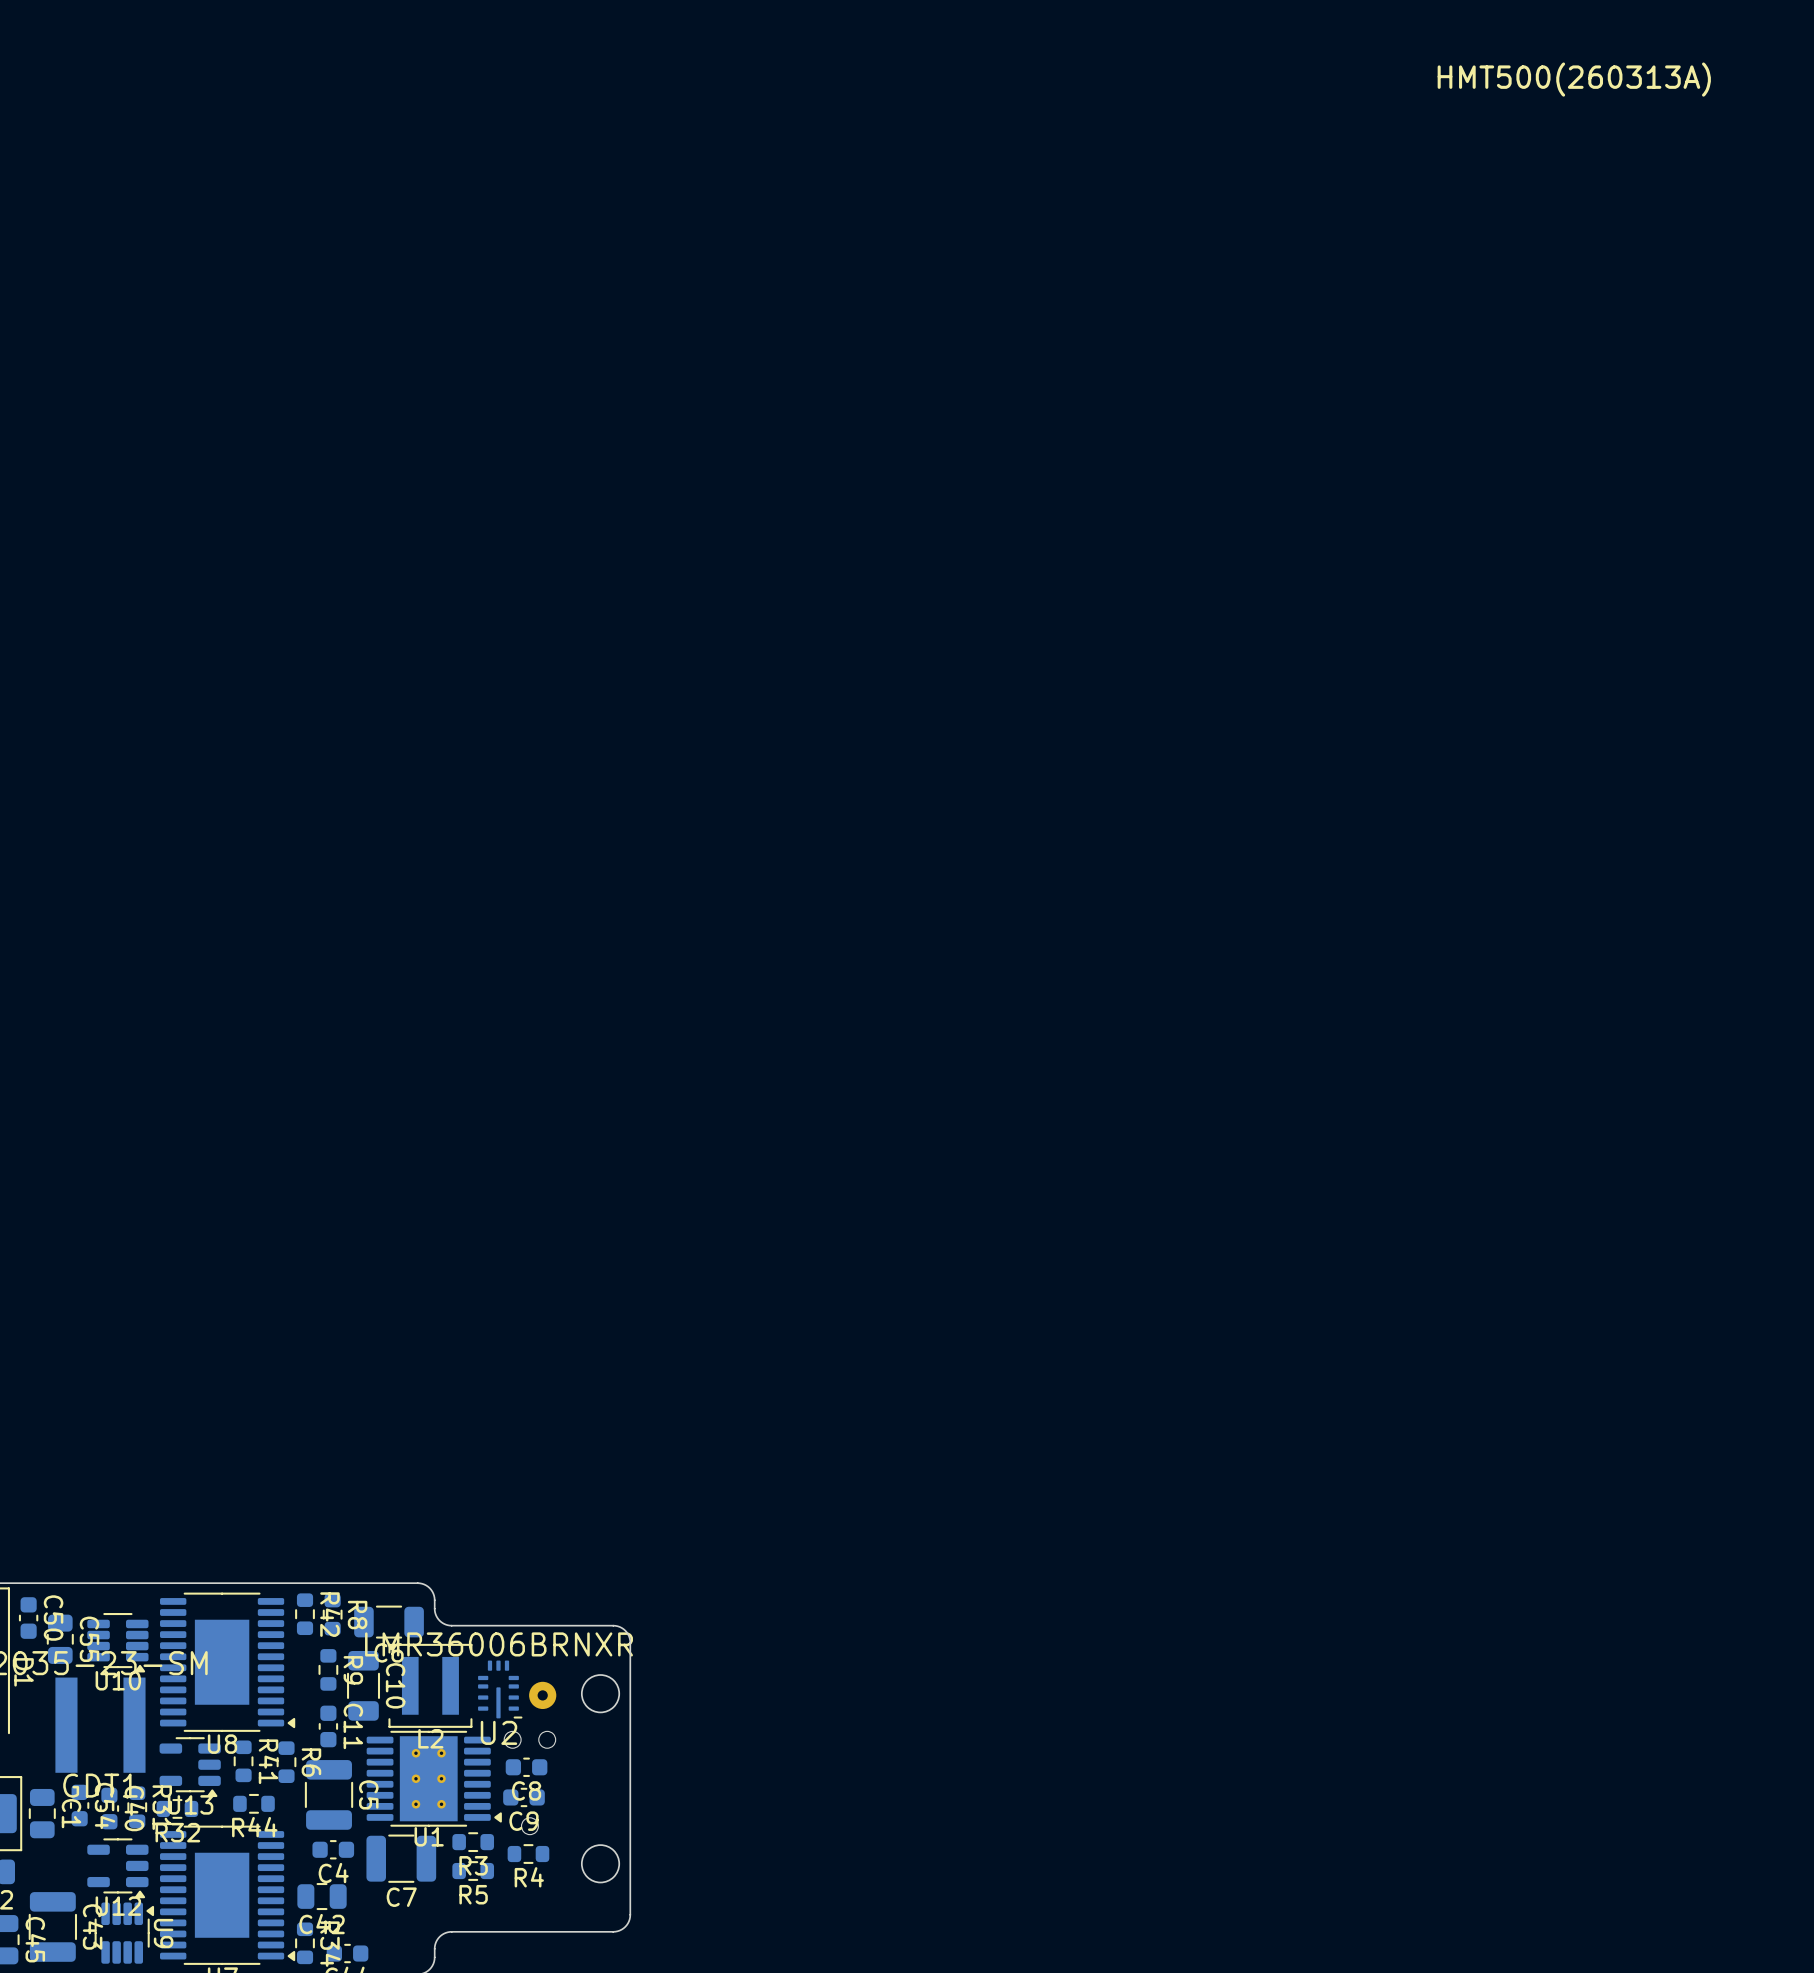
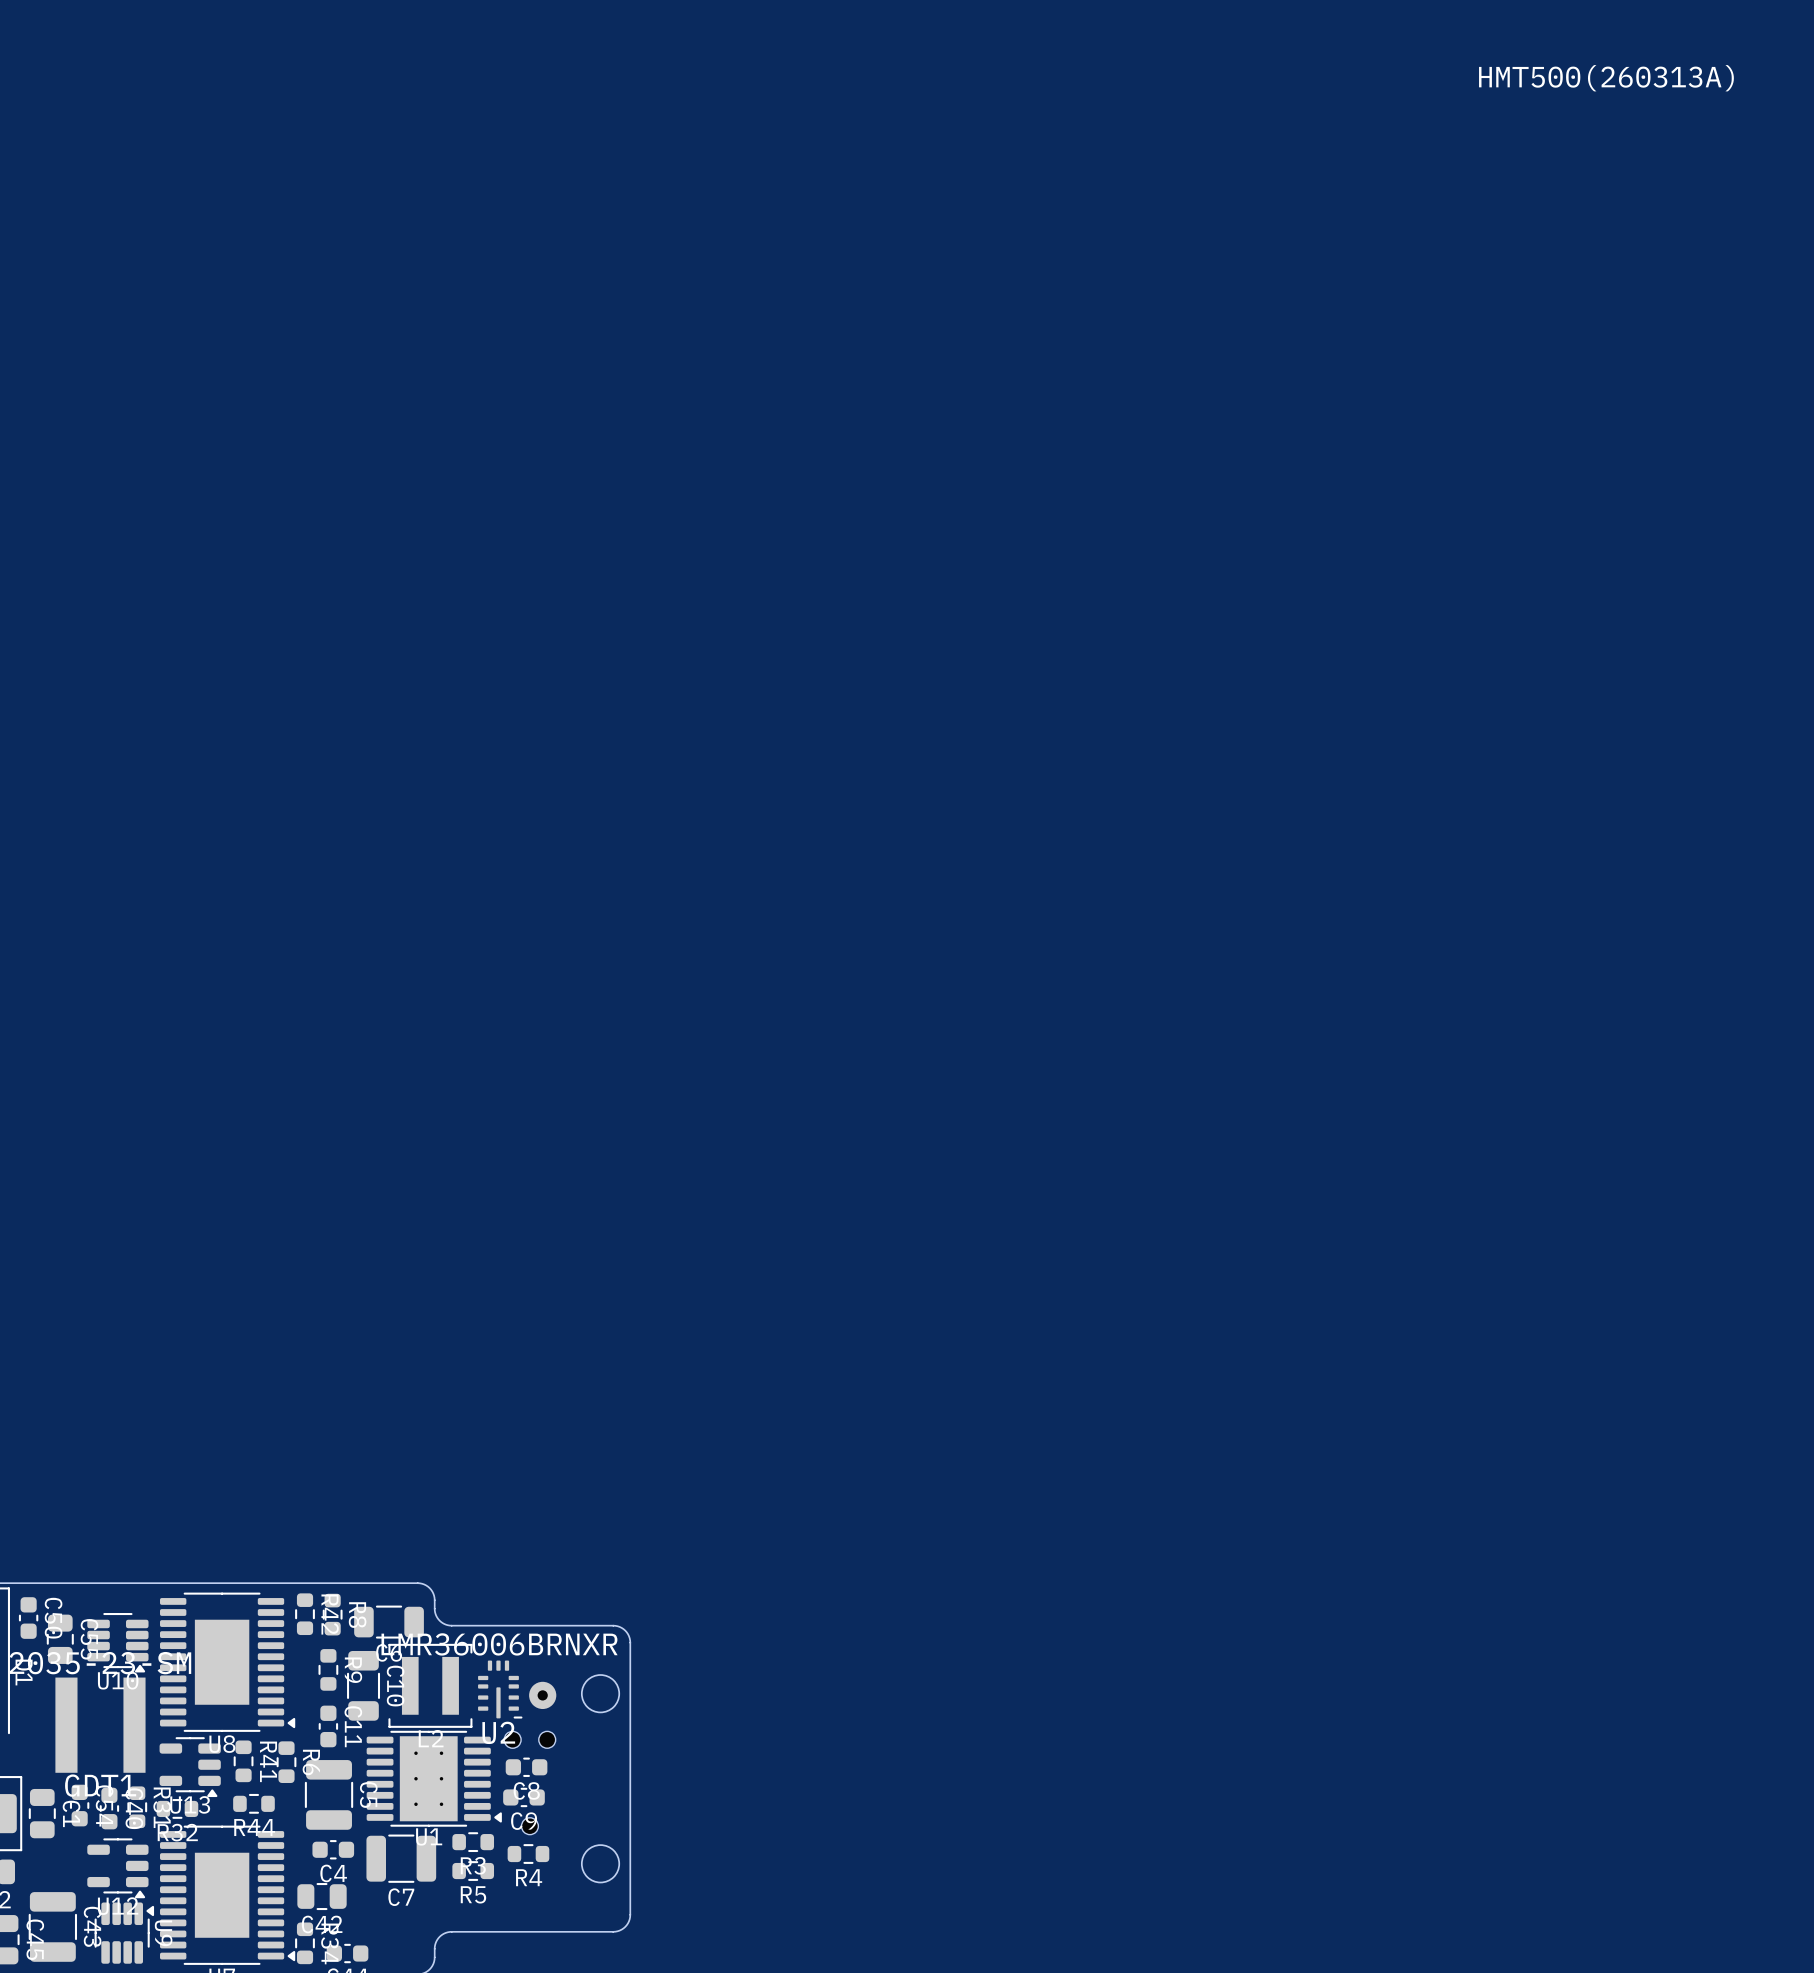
text position: HMT500(260313A) (1574, 79) -> HMT500(260313A) (1606, 78)

